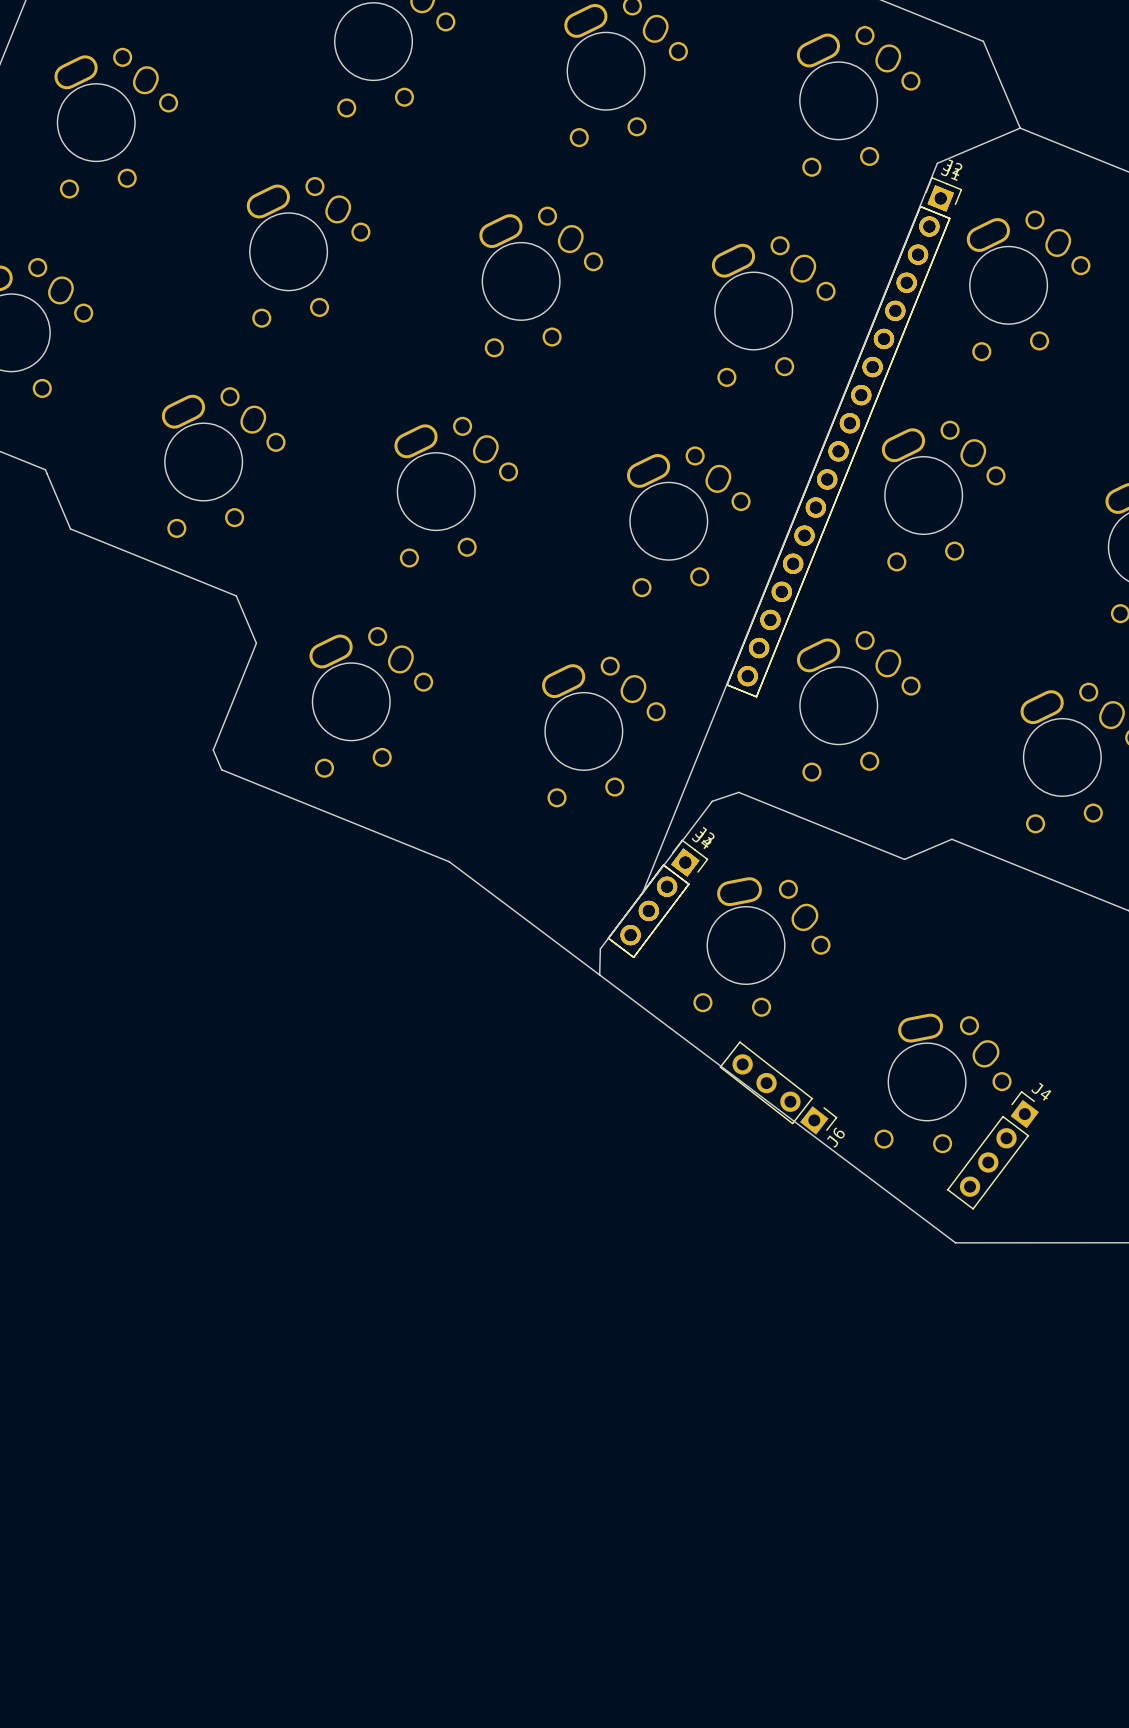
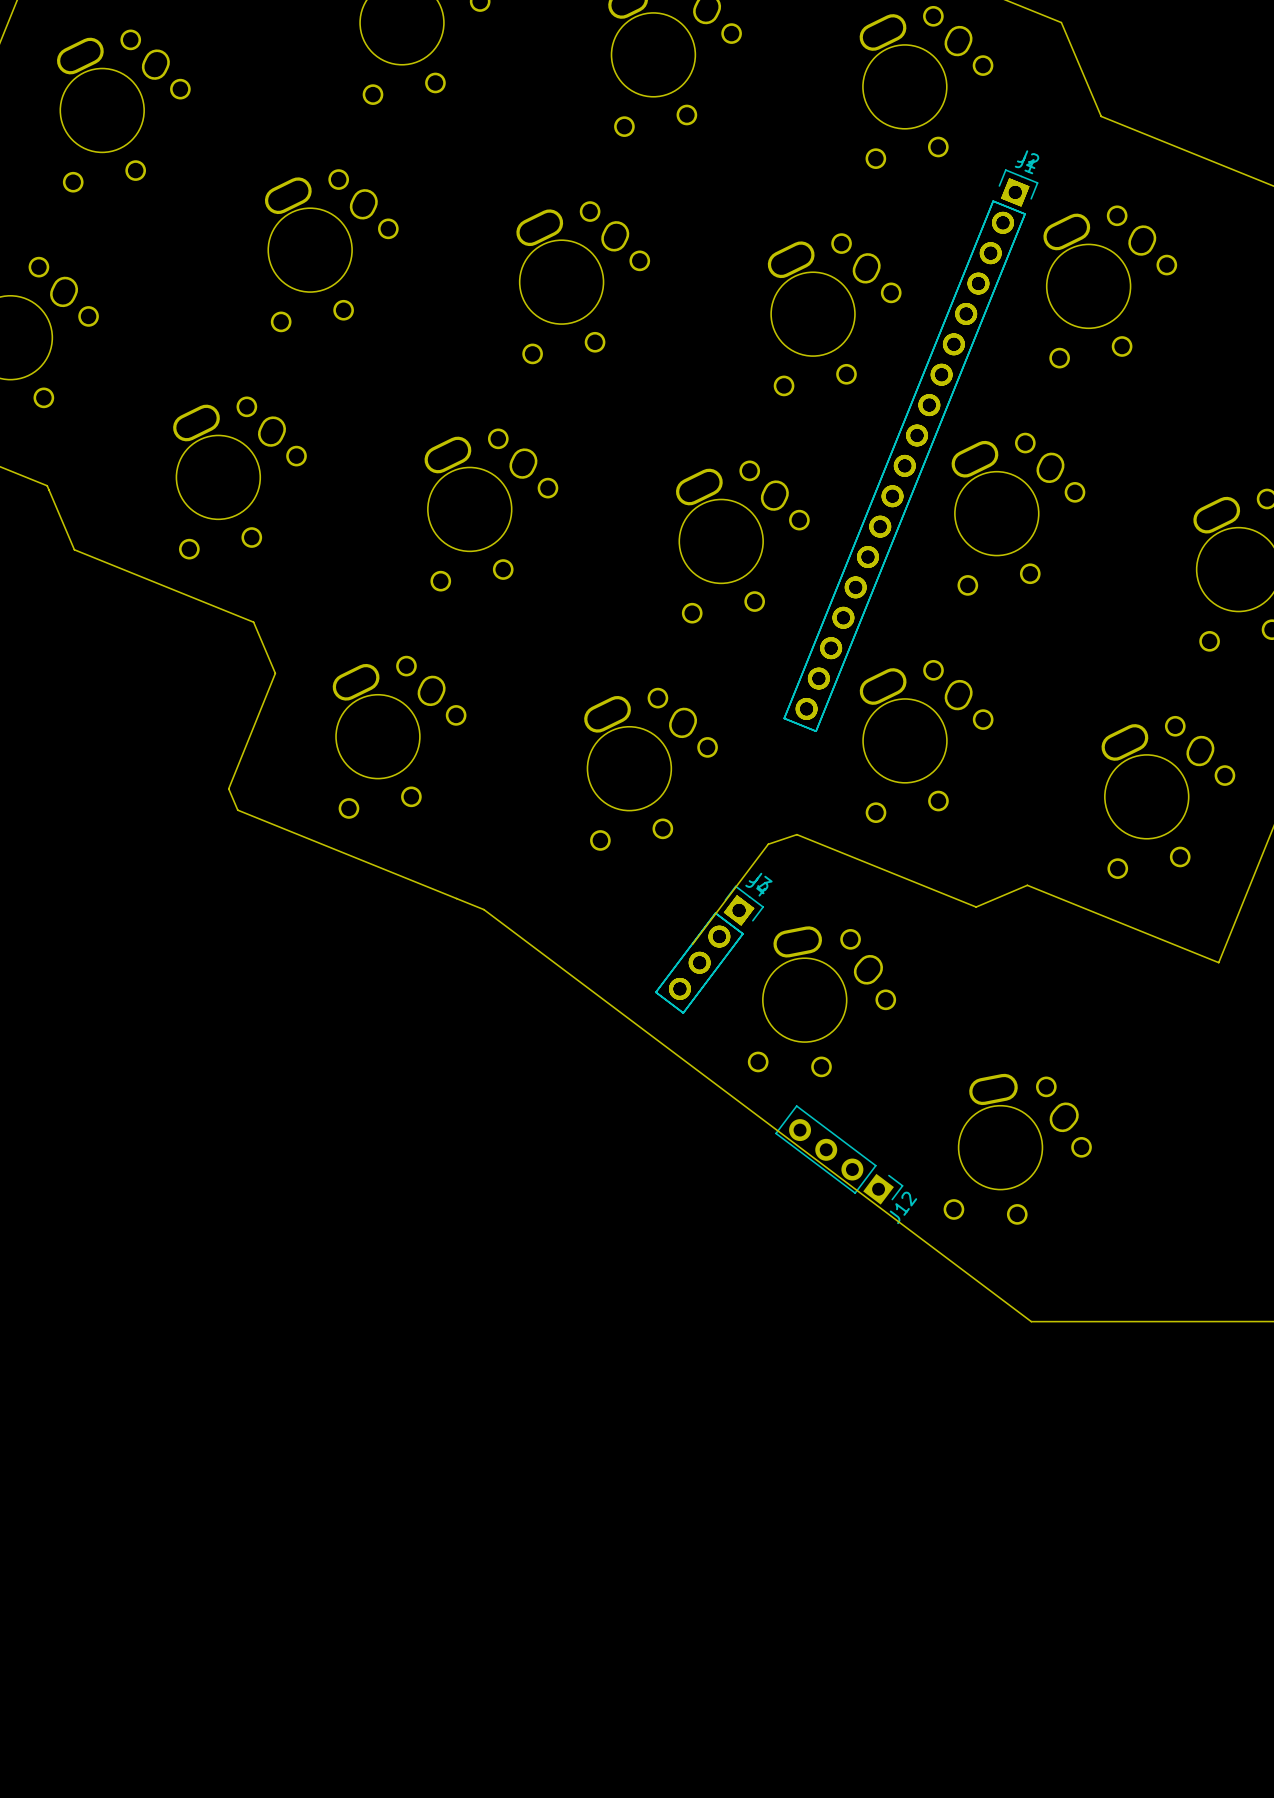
board edge: (1020, 128) (937, 163) (642, 893) (600, 948) (599, 974) -> none
J12: none -> (839, 1154)
J6: (778, 1088) -> none
J4: (993, 1150) -> none

